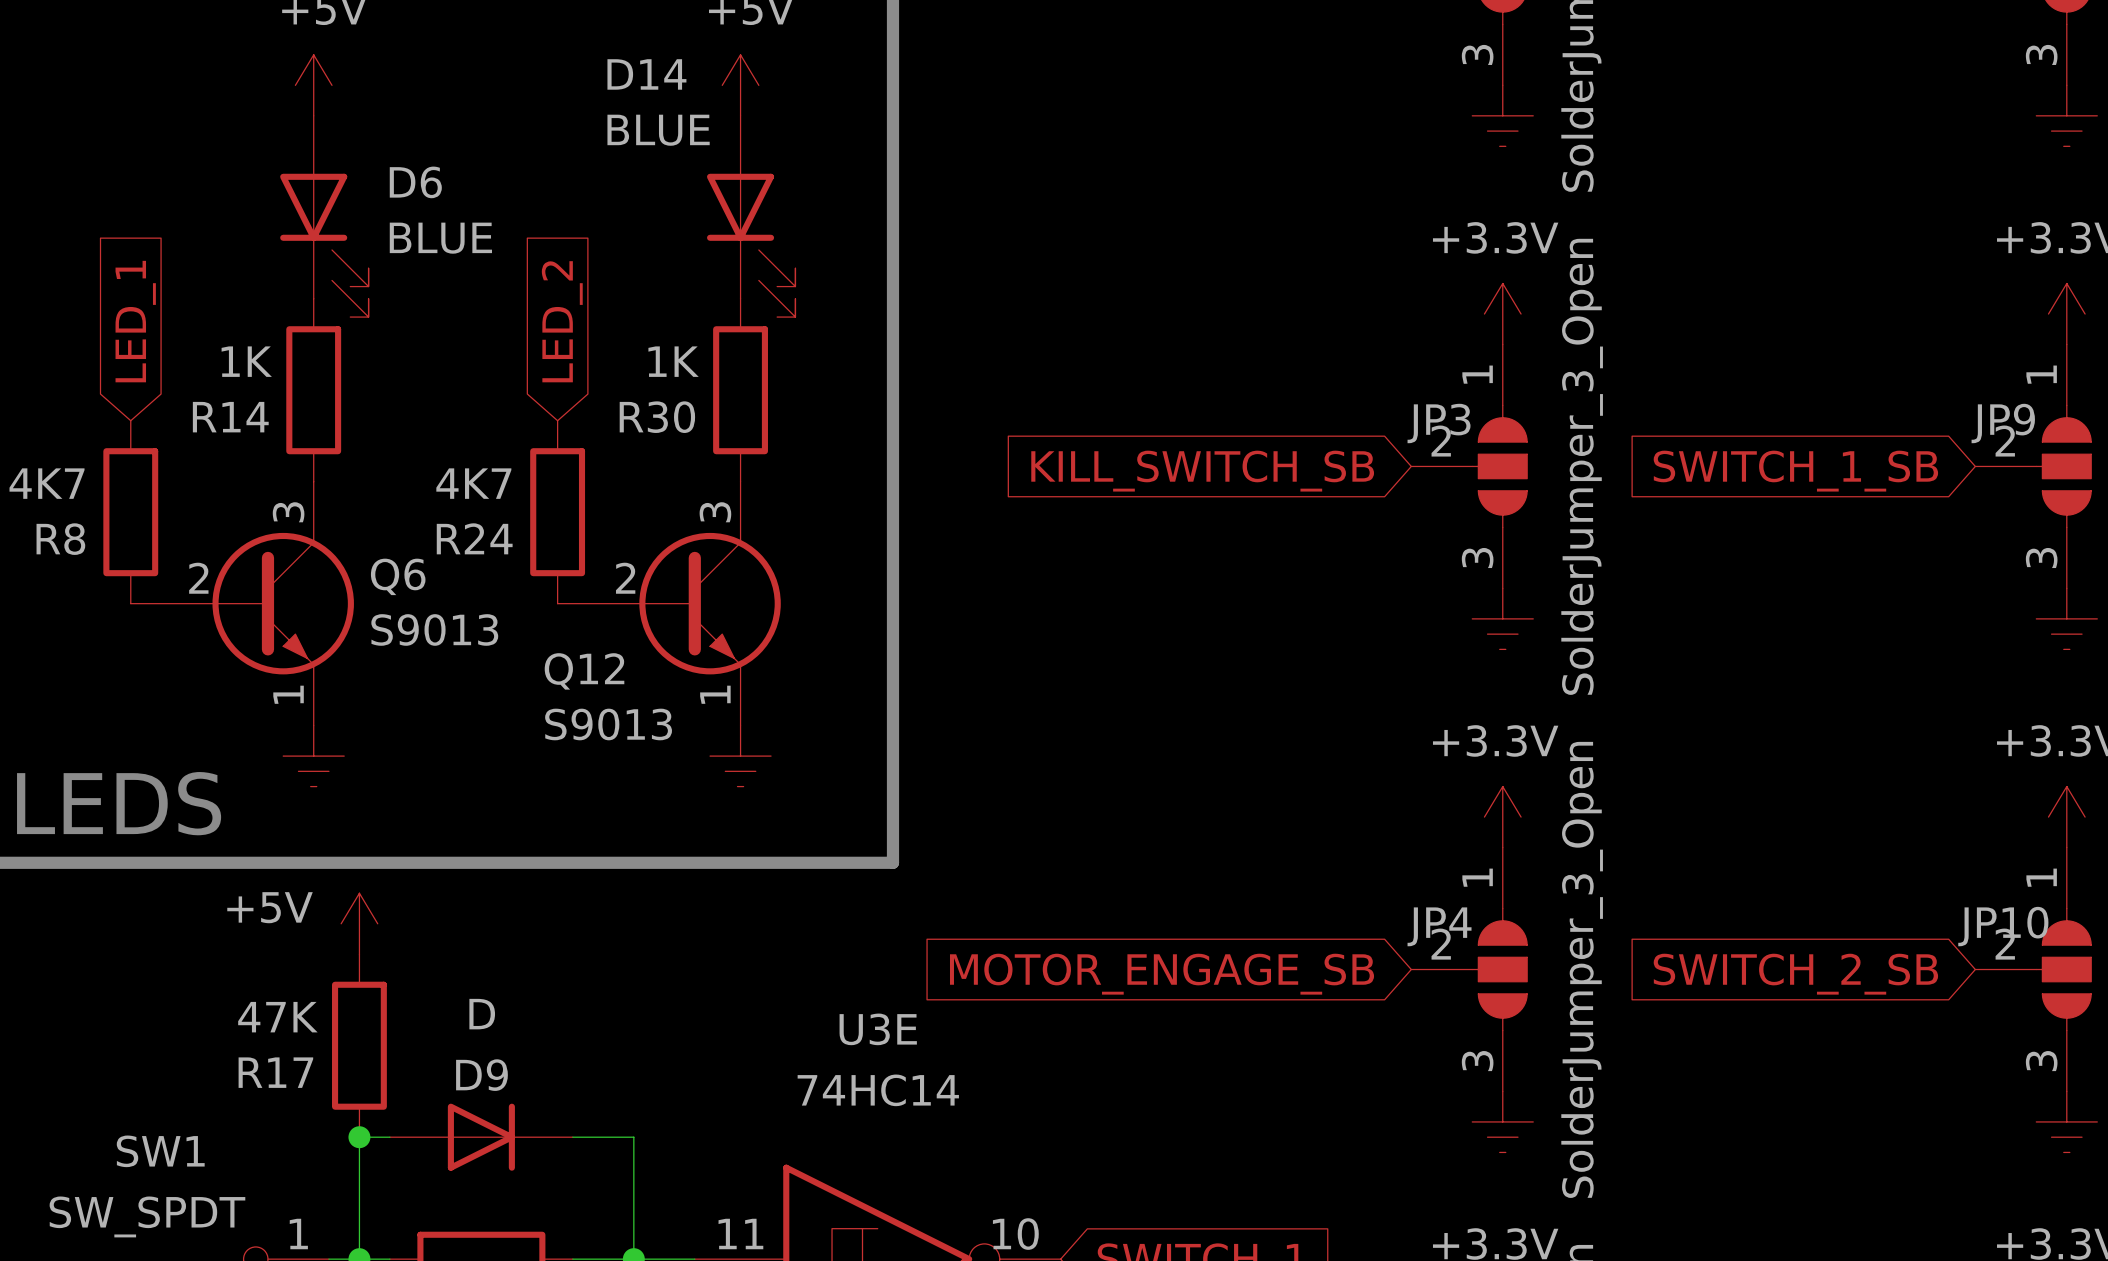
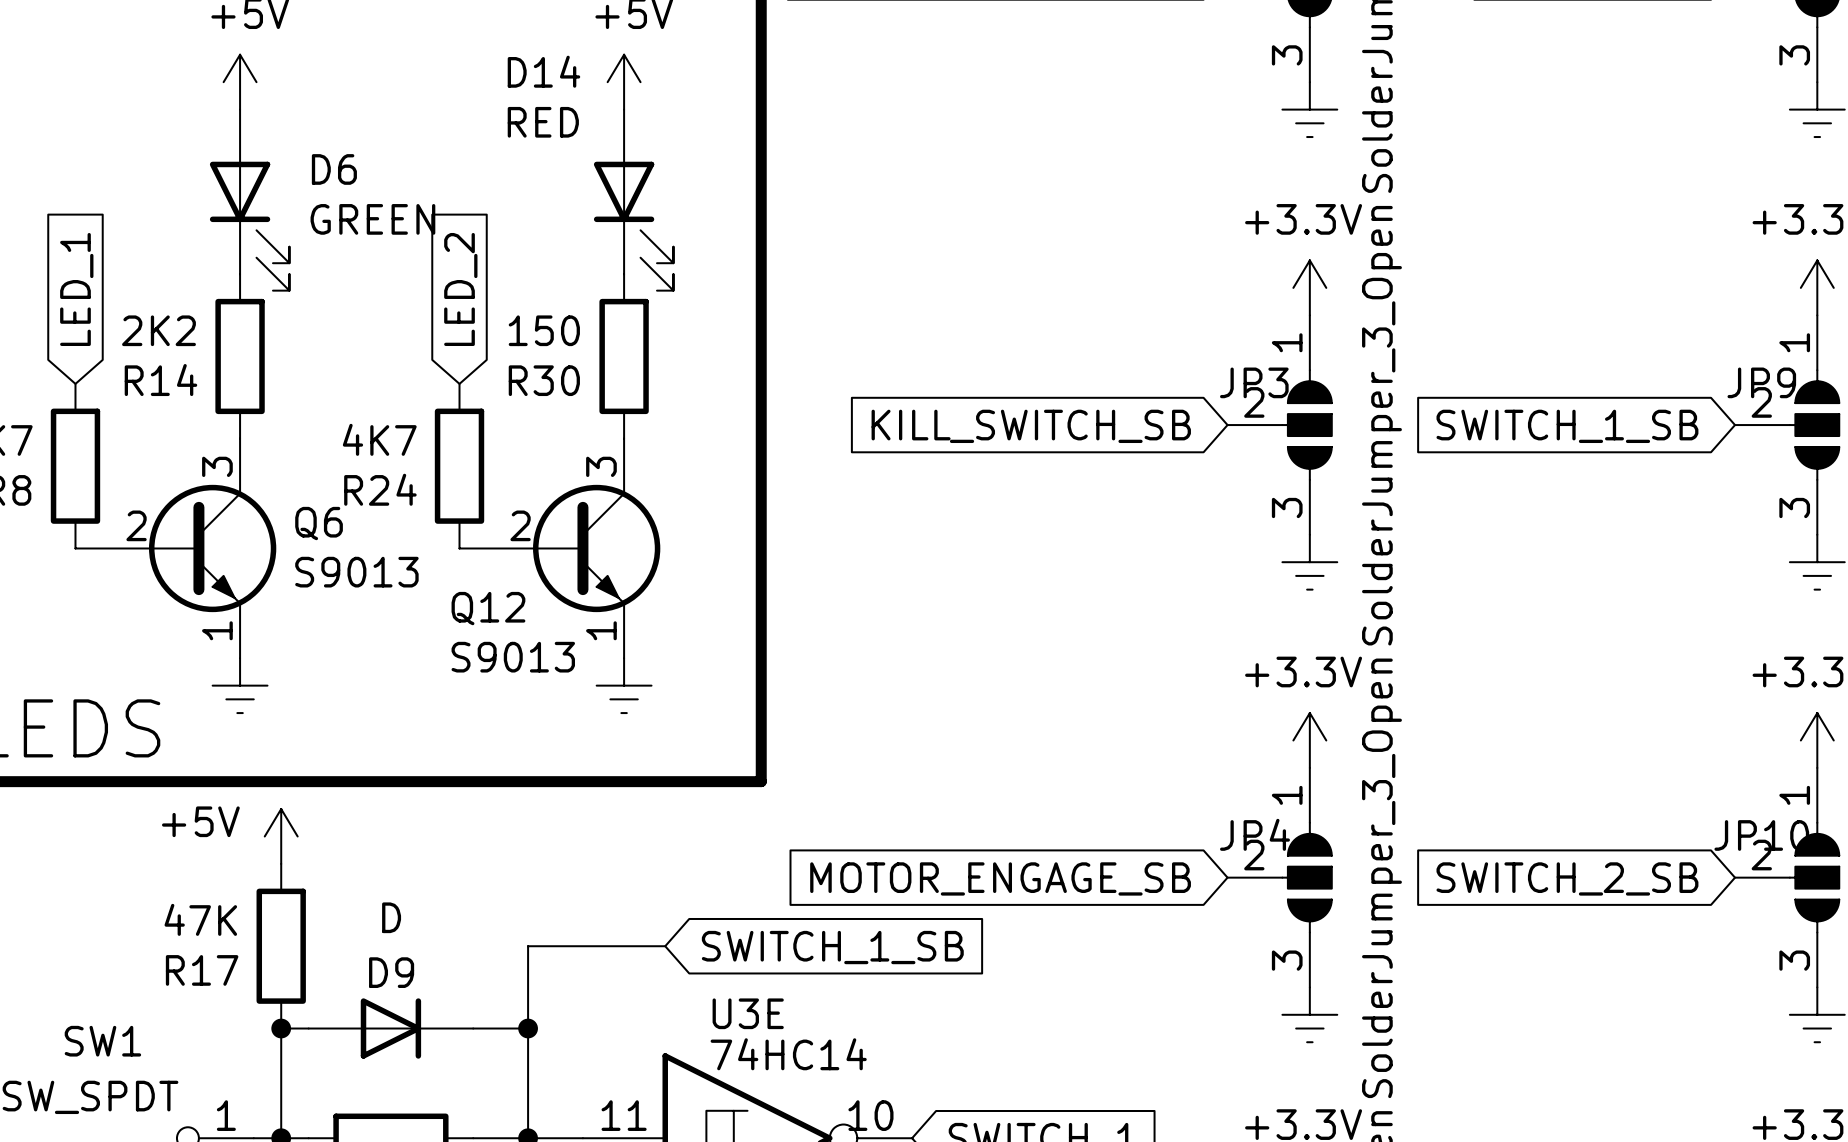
D14 value: BLUE (658, 130) -> RED (543, 122)
D6 value: BLUE (440, 238) -> GREEN (372, 219)
R14 value: 1K (246, 361) -> 2K2 (159, 330)
R30 value: 1K (673, 361) -> 150 (544, 330)
U3E name position: U3E (878, 1029) -> U3E (748, 1013)
wire: none -> (665, 946) (528, 946) (528, 1028)
global label: none -> SWITCH_1_SB (832, 947)
U3E value position: 74HC14 (878, 1090) -> 74HC14 (788, 1054)
junction: none -> (528, 1028)

